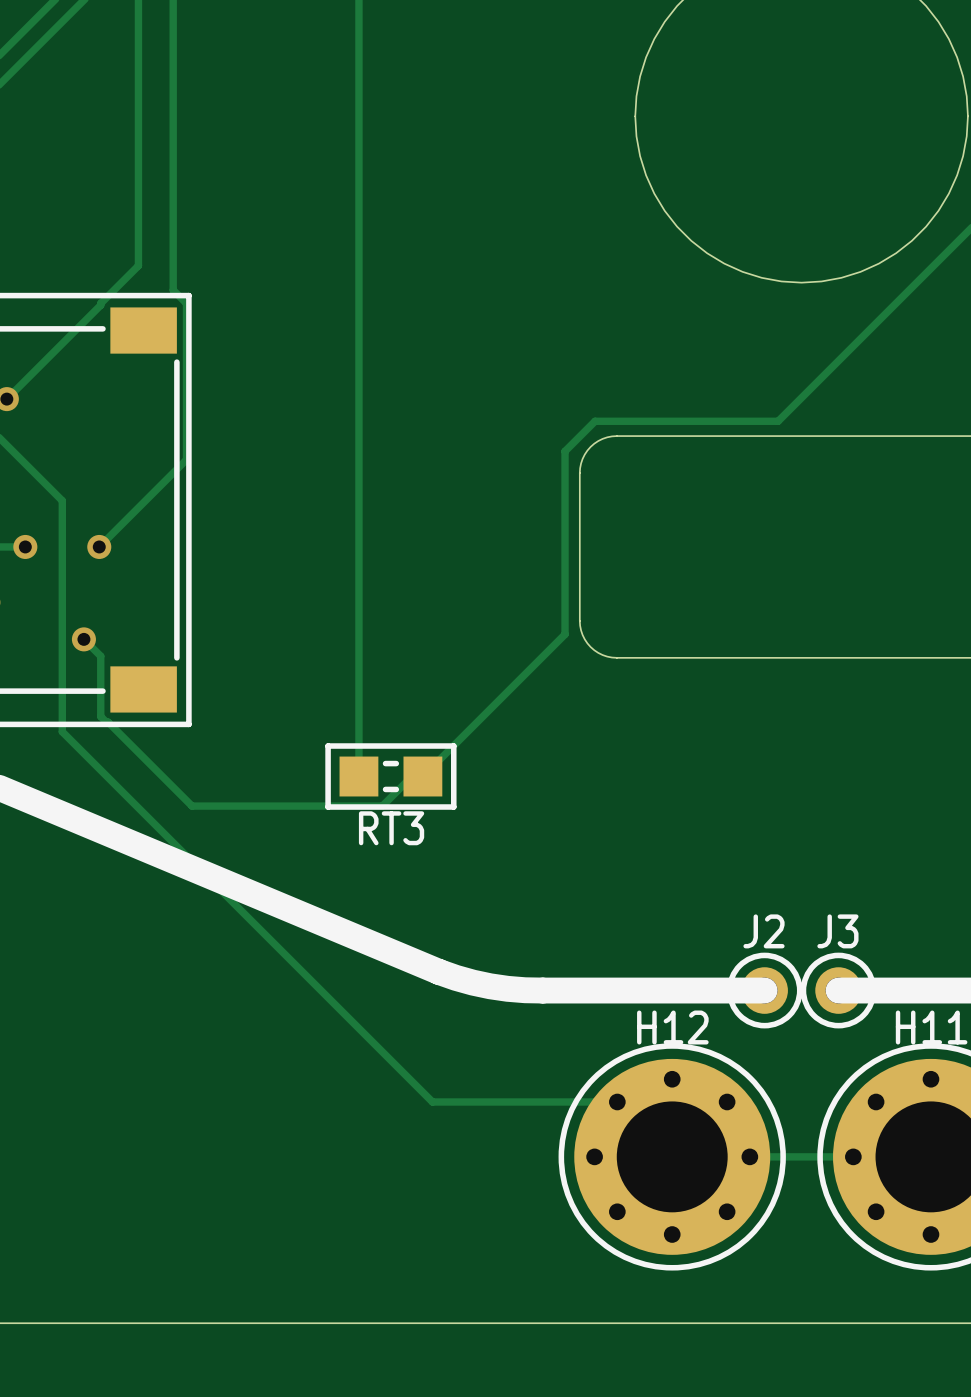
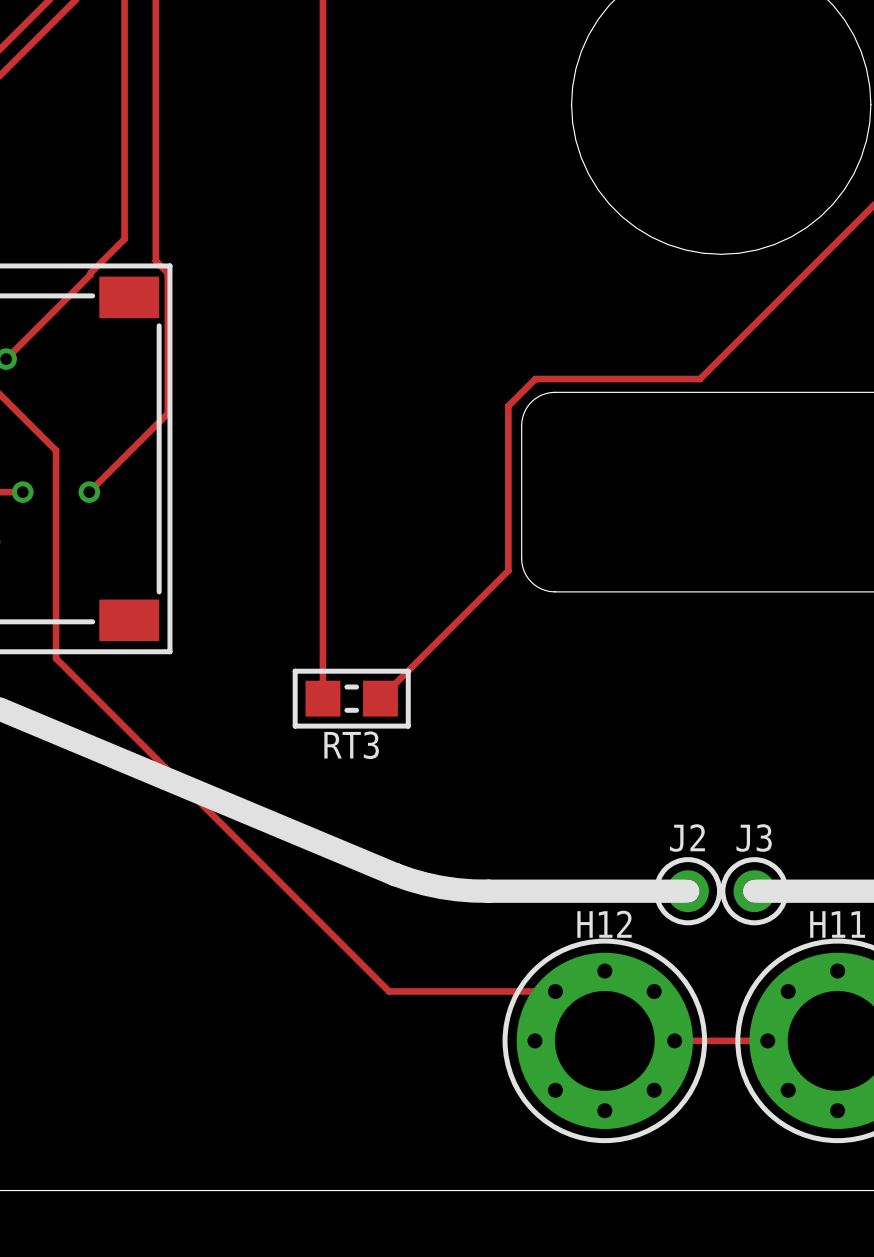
track: (83, 639) (100, 656) (100, 716) (192, 806) (382, 806) (411, 776) (422, 776) -> none
via: (83, 639) -> none

